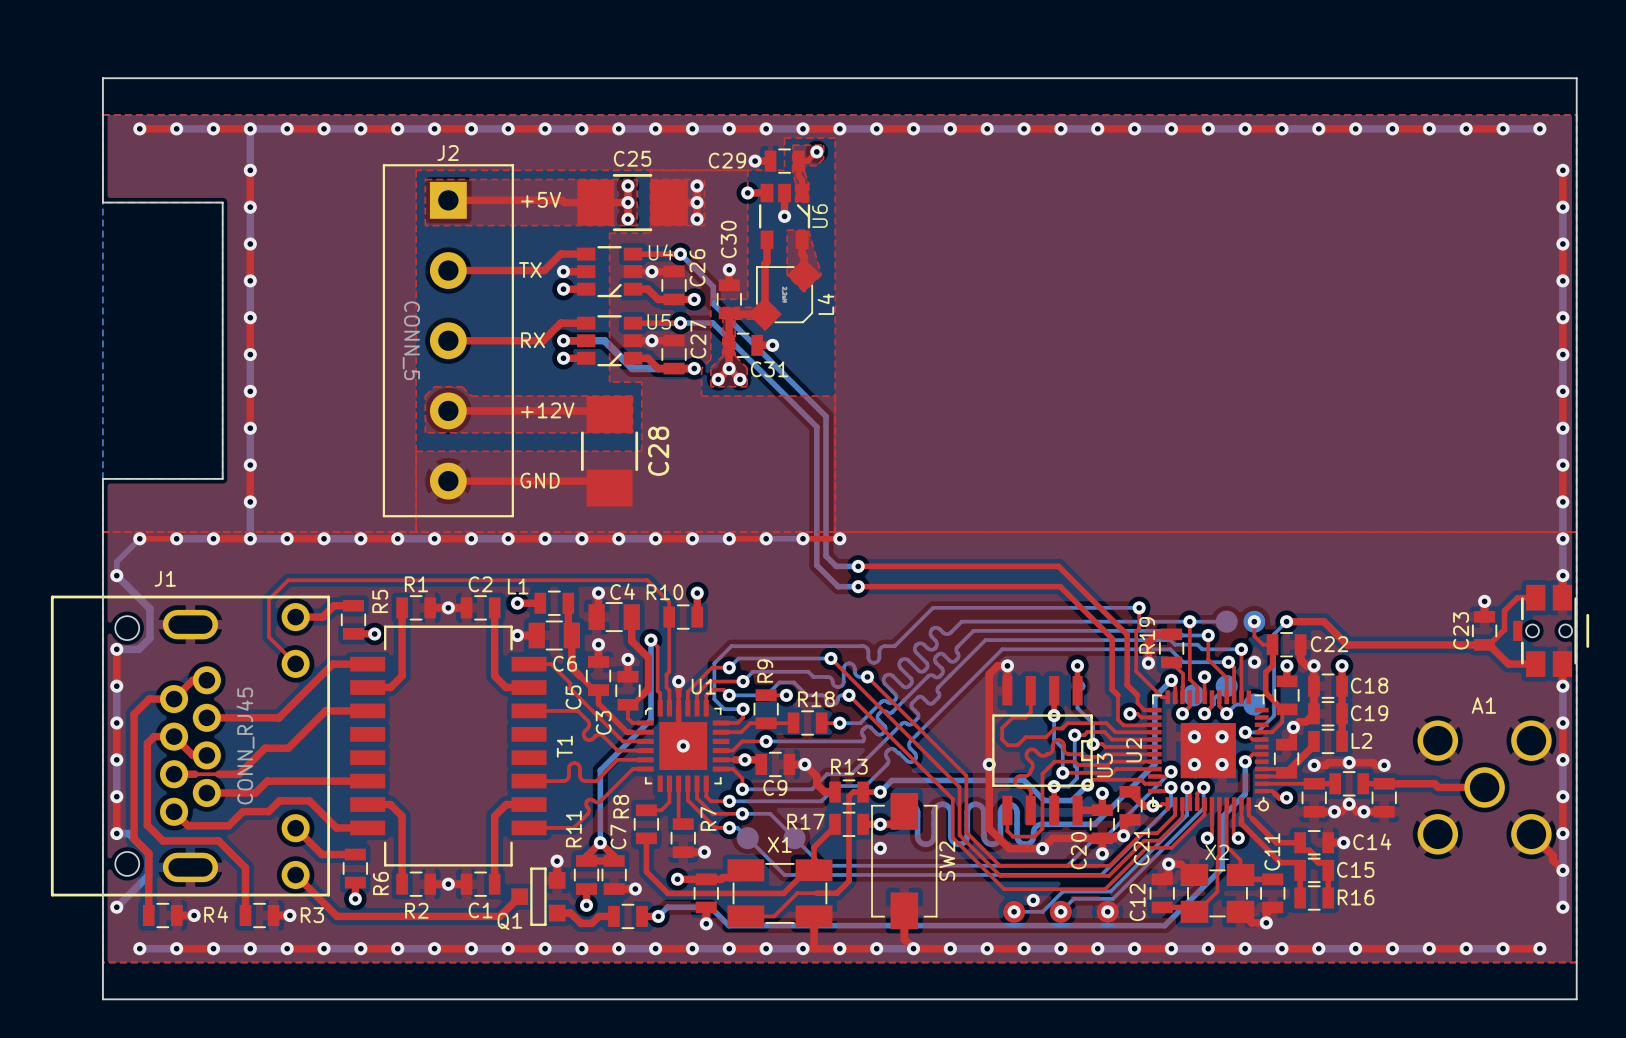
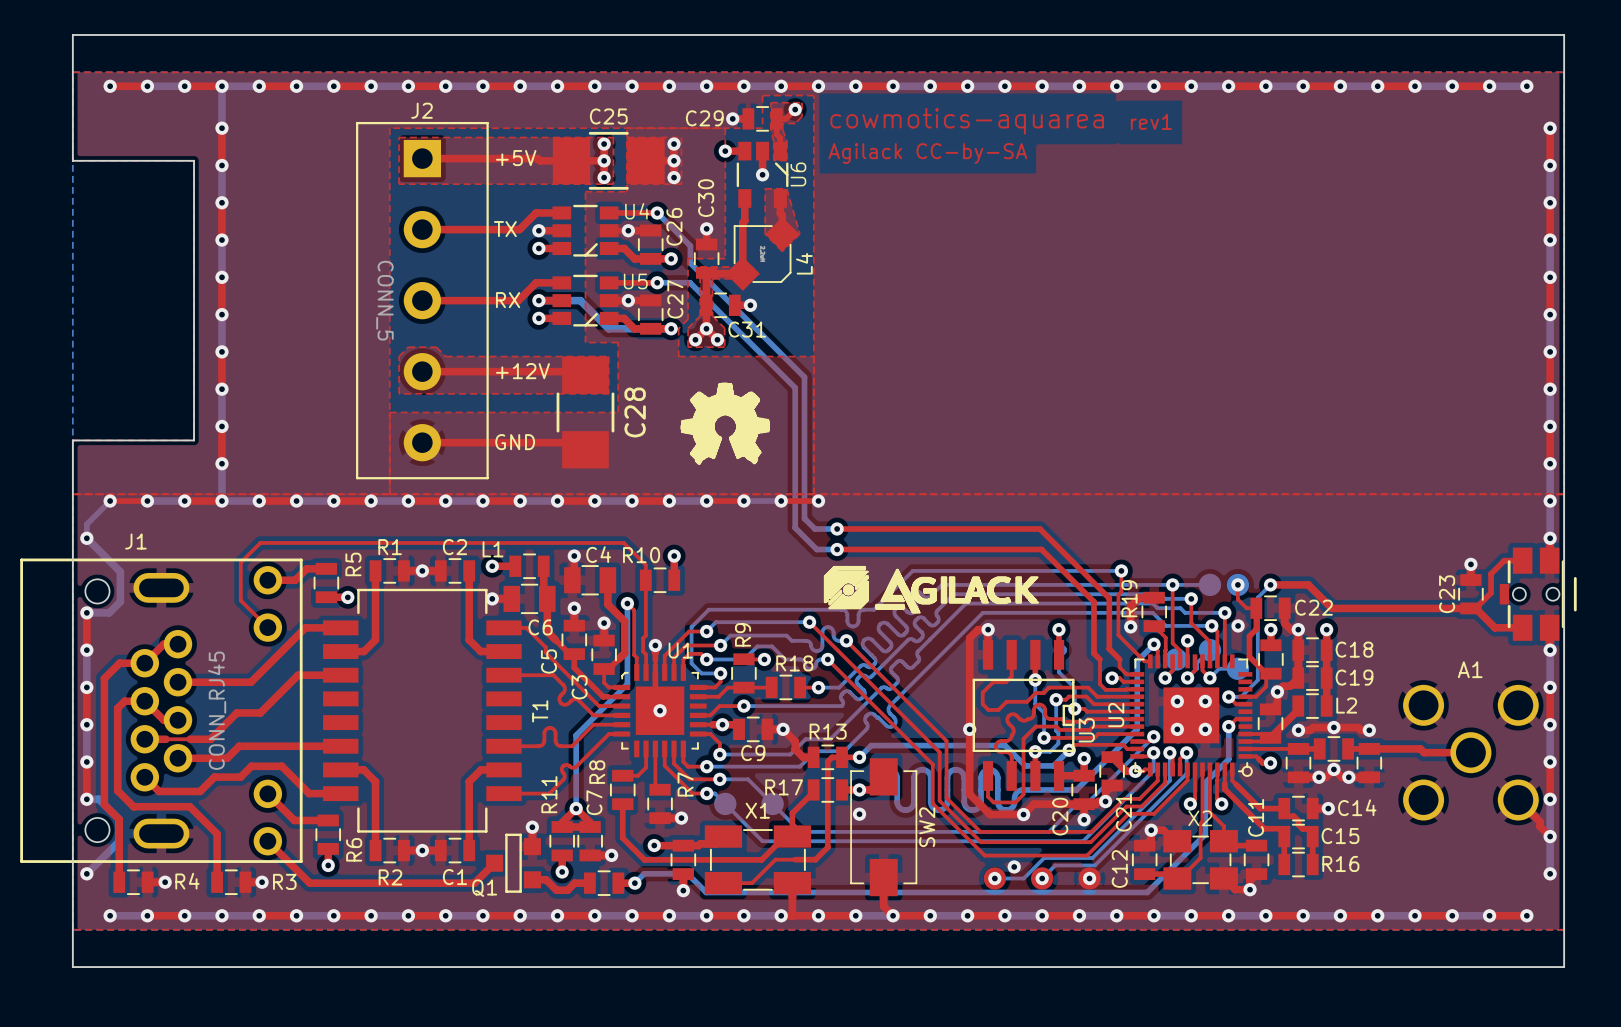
text: none -> cowmotics-aquarea (967, 121)
text: none -> rev1 (1151, 121)
text: none -> Agilack CC-by-SA (927, 153)
drawing: none -> [681, 383, 770, 465]
drawing: none -> [824, 566, 1039, 613]

